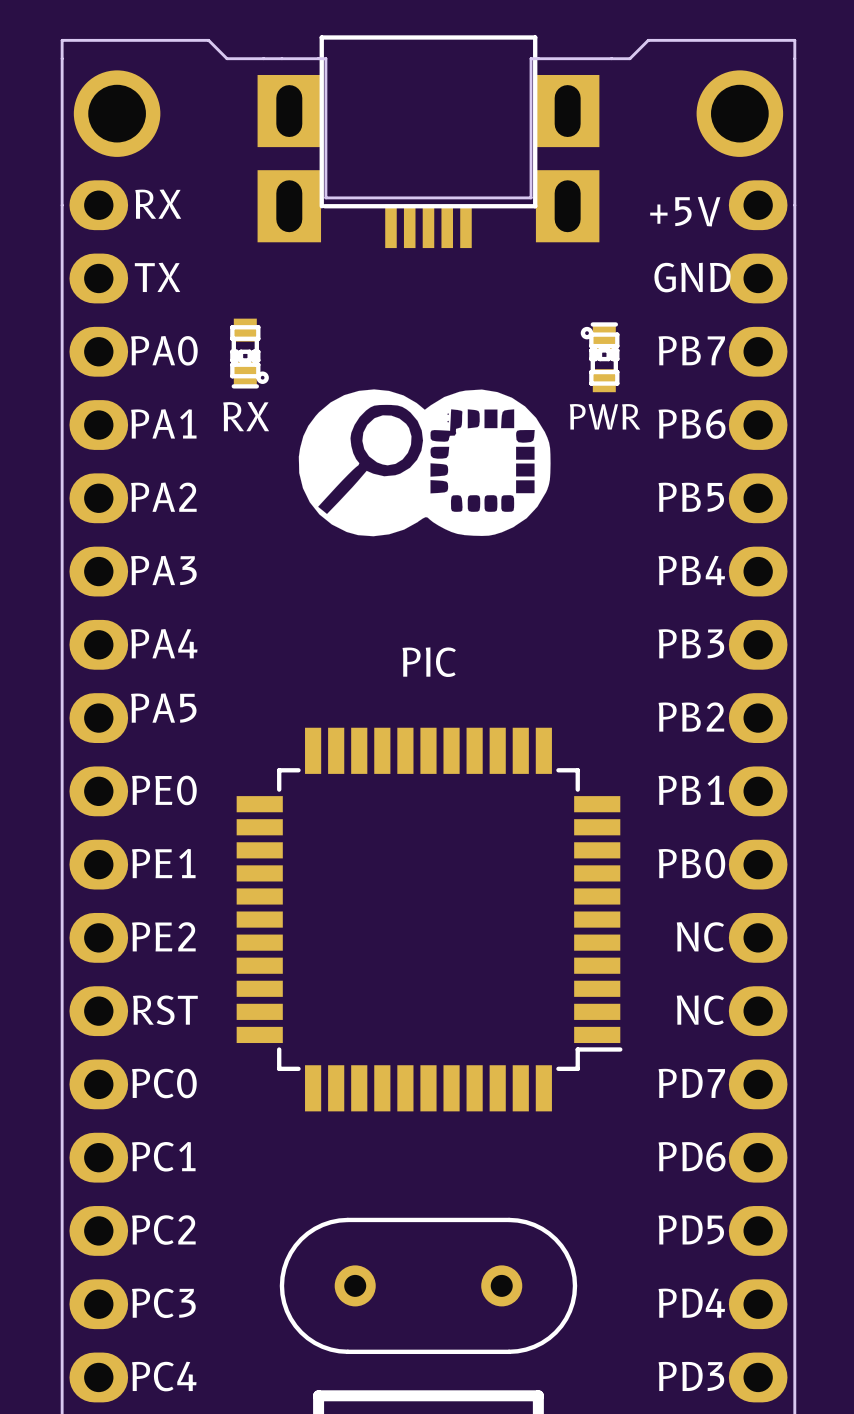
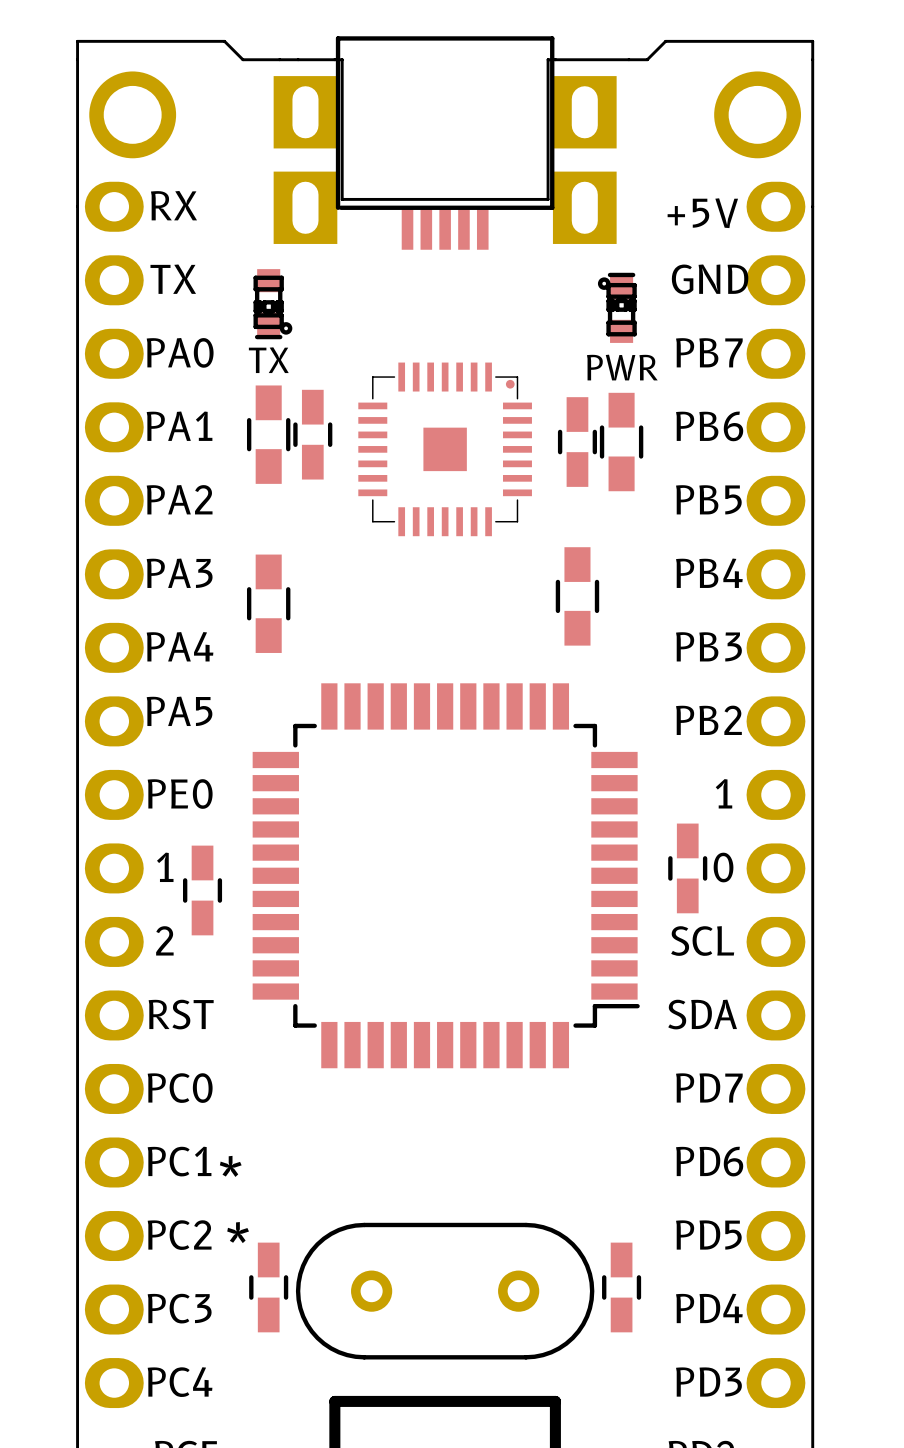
part position: (249, 353) -> (272, 304)
part position: (600, 357) -> (617, 307)
text: none -> TX (268, 360)
drawing: [298, 389, 551, 537] -> none
text: RX (246, 416) -> none
text position: PWR (605, 416) -> PWR (622, 367)
part: none -> (268, 434)
part: none -> (312, 434)
part: none -> (577, 442)
part: none -> (621, 442)
part: none -> (445, 449)
part: none -> (577, 596)
part: none -> (268, 603)
text: PIC (429, 662) -> none
text: PB1 (691, 790) -> 1 (723, 793)
text: PE1 (163, 863) -> 1 (165, 867)
text: PB0 (691, 863) -> 0 (723, 867)
part: none -> (687, 868)
part: none -> (202, 890)
part position: (429, 919) -> (446, 875)
text: PE2 (163, 936) -> 2 (164, 940)
text: NC (700, 936) -> SCL (702, 941)
text: NC (700, 1010) -> SDA (702, 1014)
text: none -> * (230, 1166)
text: none -> * (238, 1232)
part: none -> (268, 1287)
part: none -> (621, 1287)

